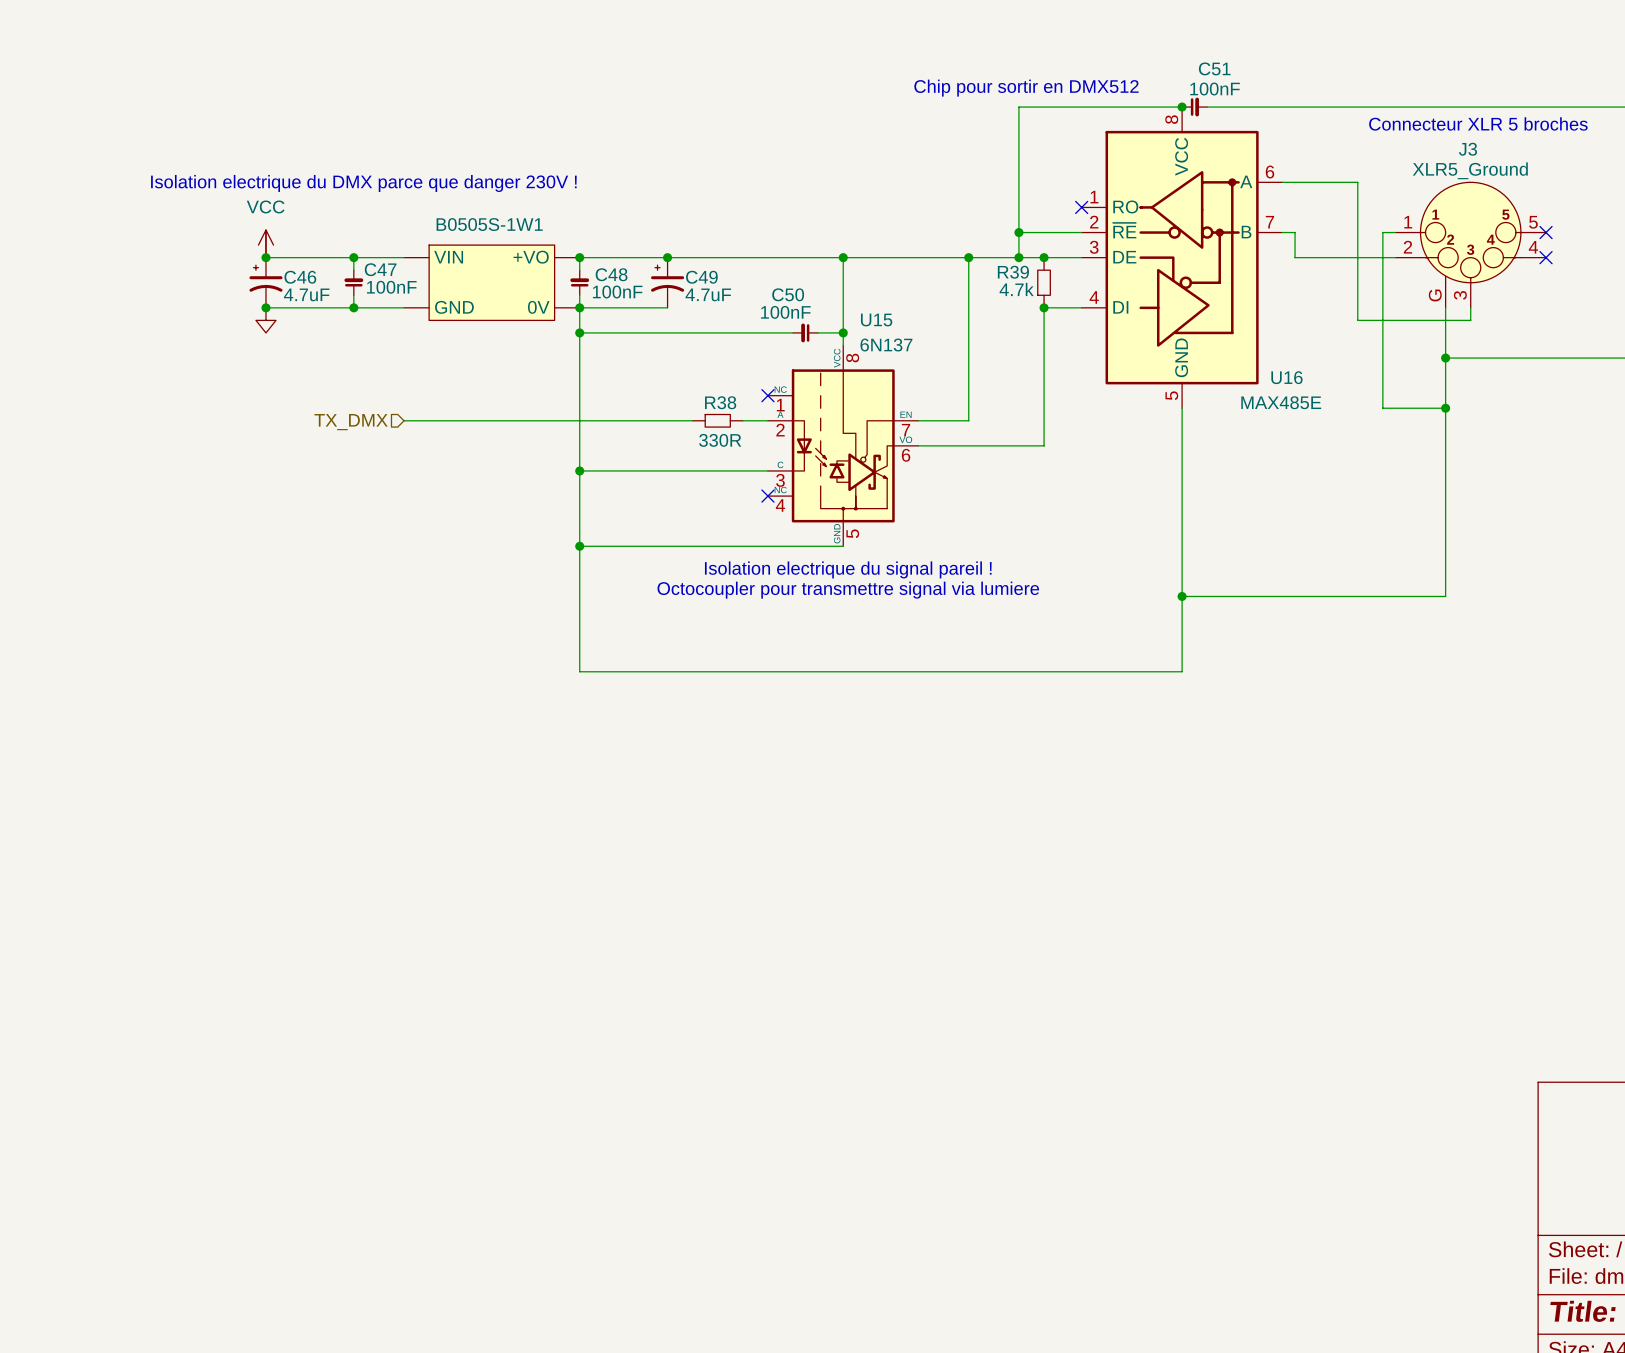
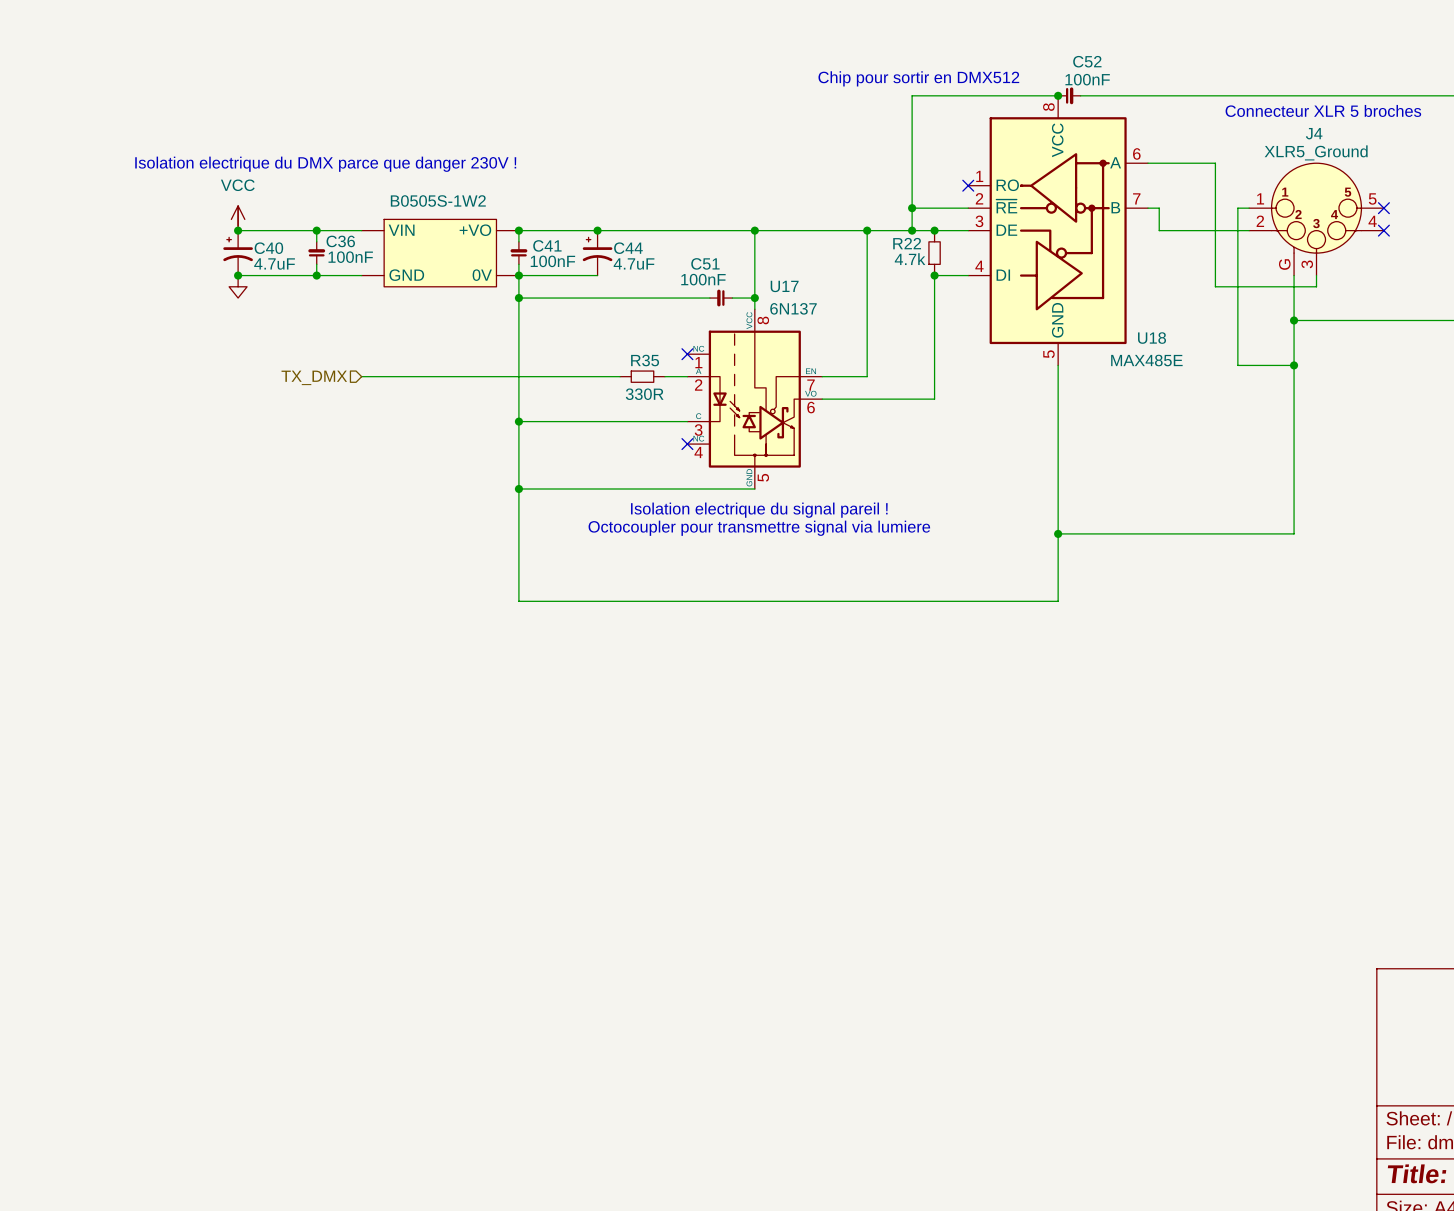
C51 name: C51 (1214, 68) -> C52 (1087, 61)
J3 name: J3 (1467, 149) -> J4 (1314, 133)
B0505S-1W1 name: B0505S-1W1 (489, 224) -> B0505S-1W2 (438, 200)
C47 name: C47 (380, 269) -> C36 (340, 241)
R39 name: R39 (1013, 272) -> R22 (907, 243)
C48 name: C48 (611, 274) -> C41 (547, 245)
C46 name: C46 (300, 277) -> C40 (268, 248)
C49 name: C49 (701, 277) -> C44 (628, 248)
C50 name: C50 (788, 294) -> C51 (705, 263)
U15 name: U15 (876, 320) -> U17 (784, 286)
U16 name: U16 (1286, 377) -> U18 (1152, 338)
R38 name: R38 (720, 402) -> R35 (645, 360)

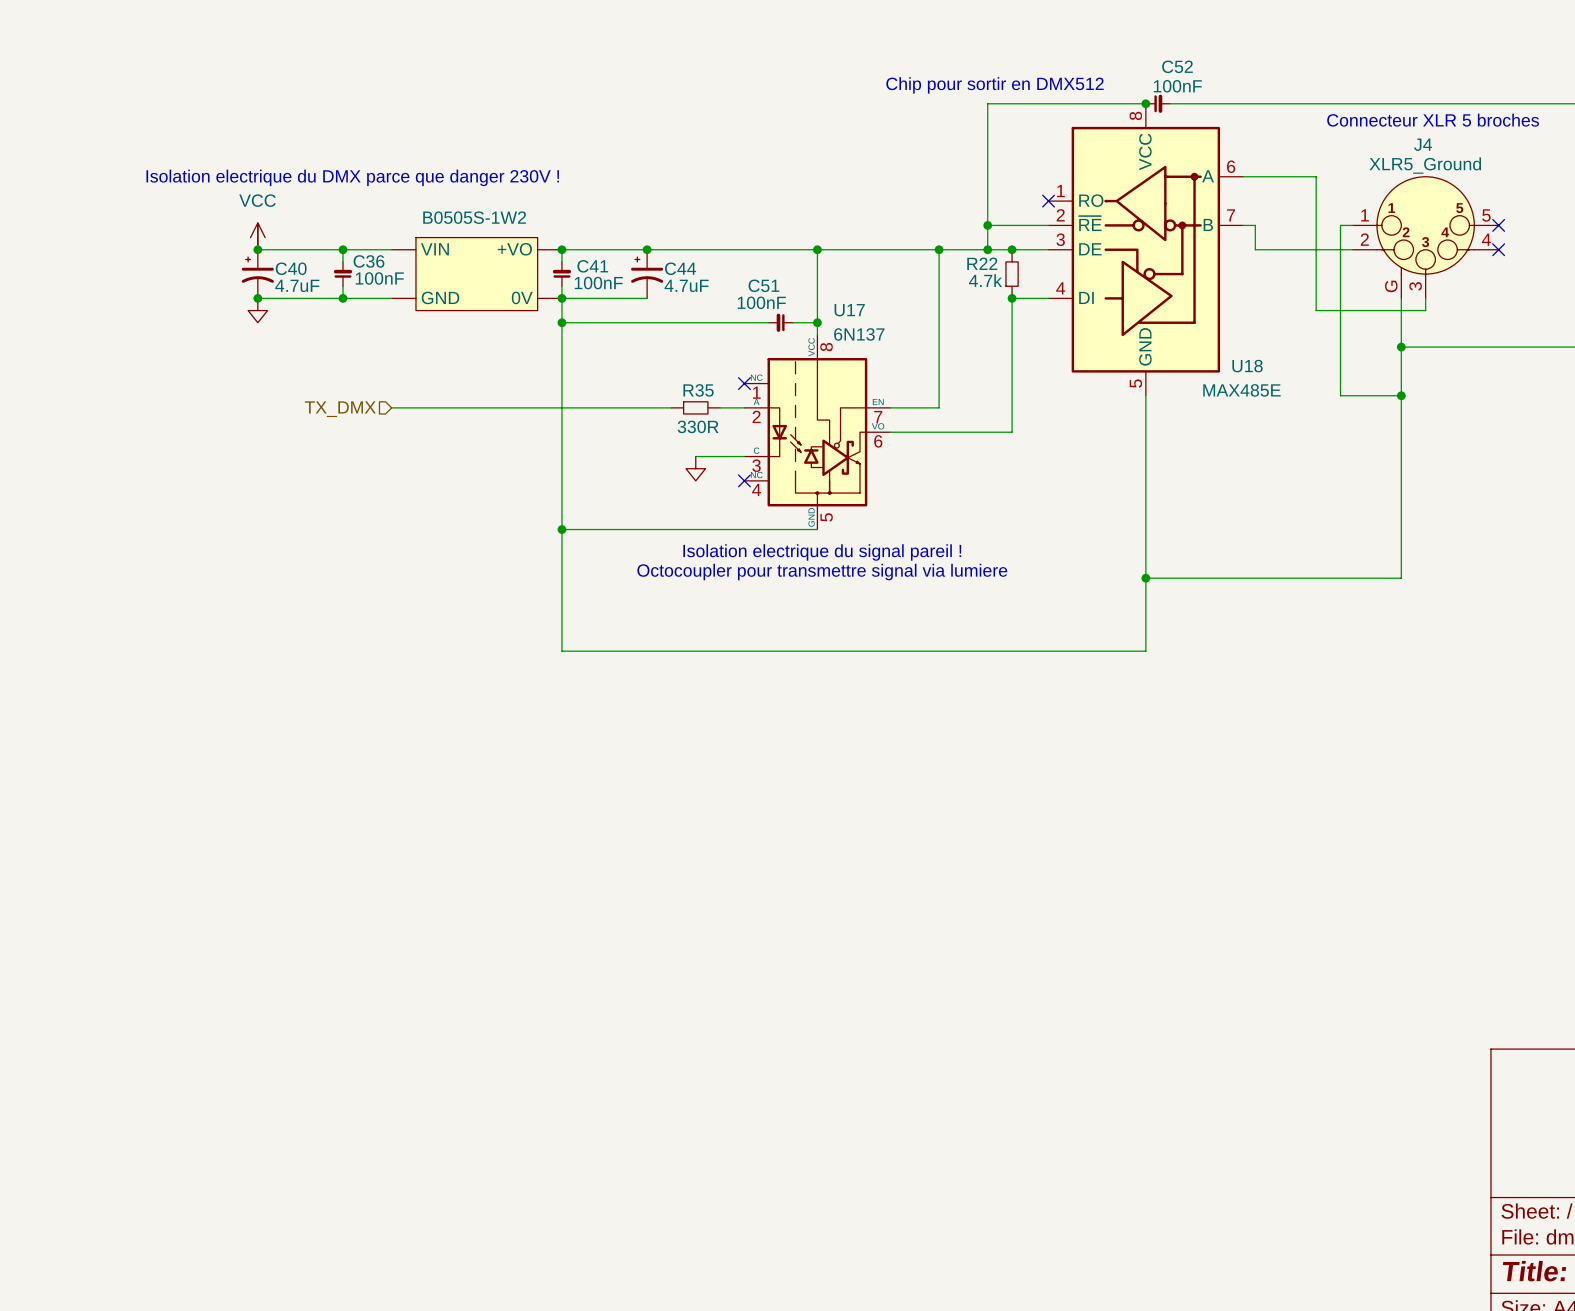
wire: (518, 421) (642, 421) -> none
junction: (518, 421) -> none
power symbol: none -> (695, 468)

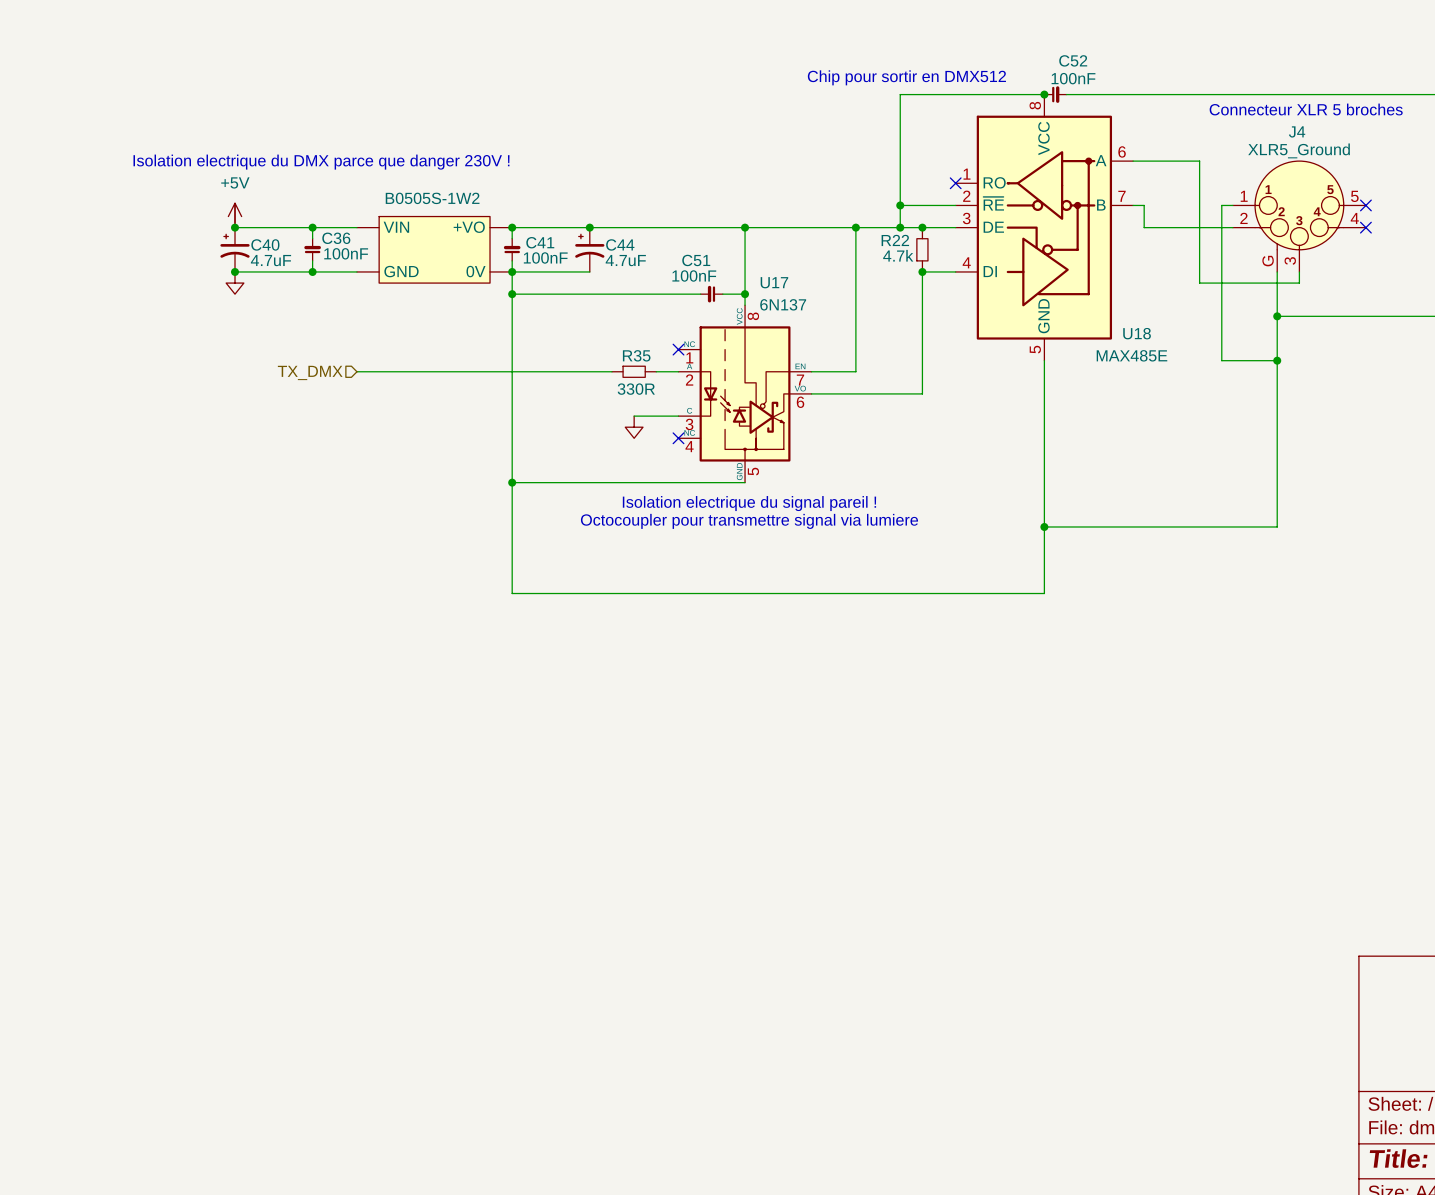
power symbol: VCC (257, 236) -> +5V (235, 215)

